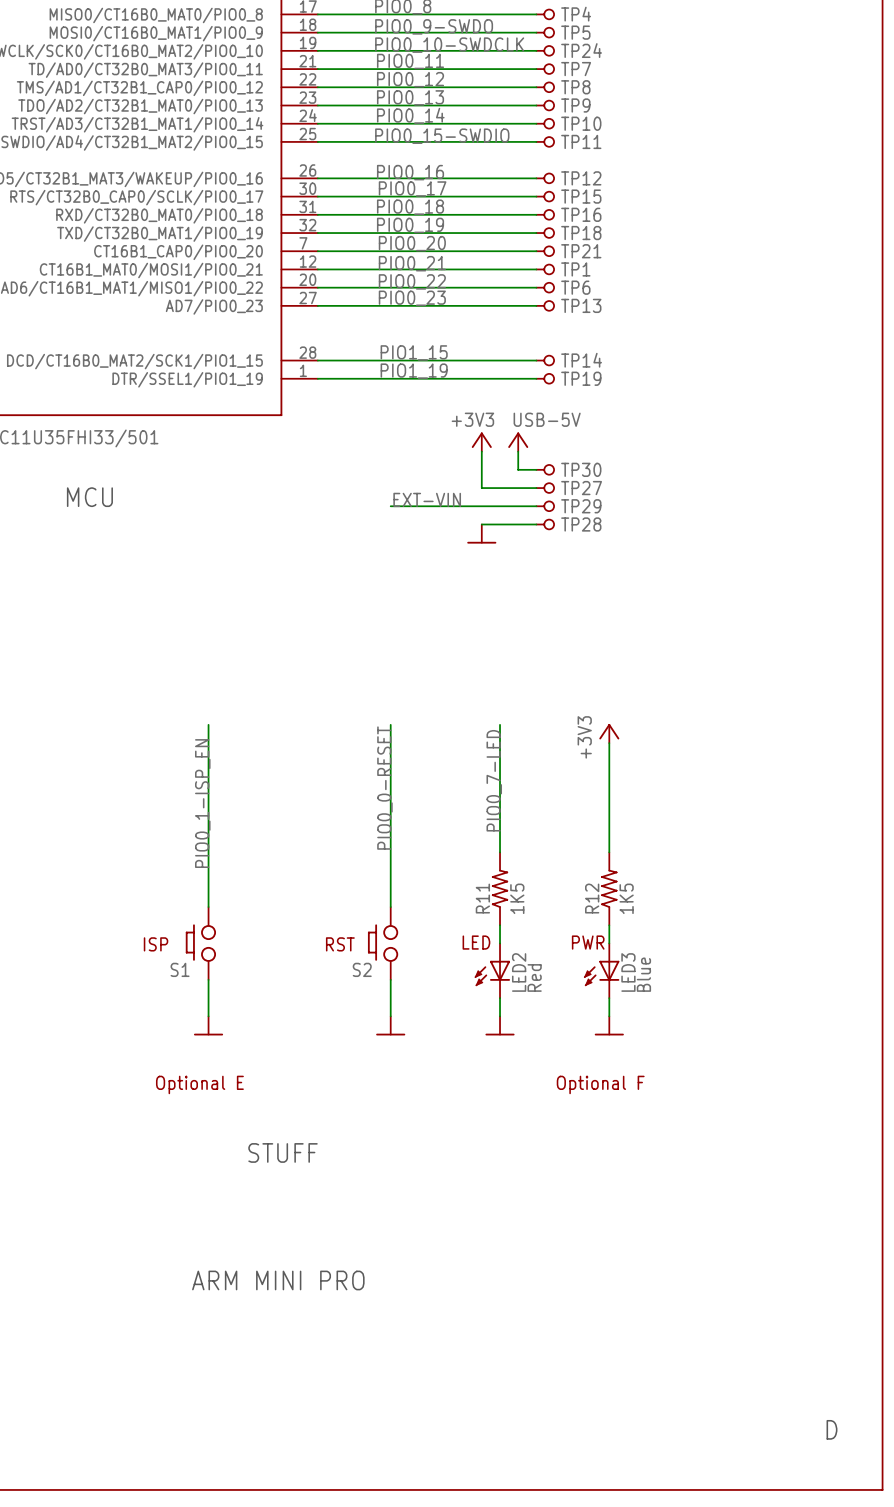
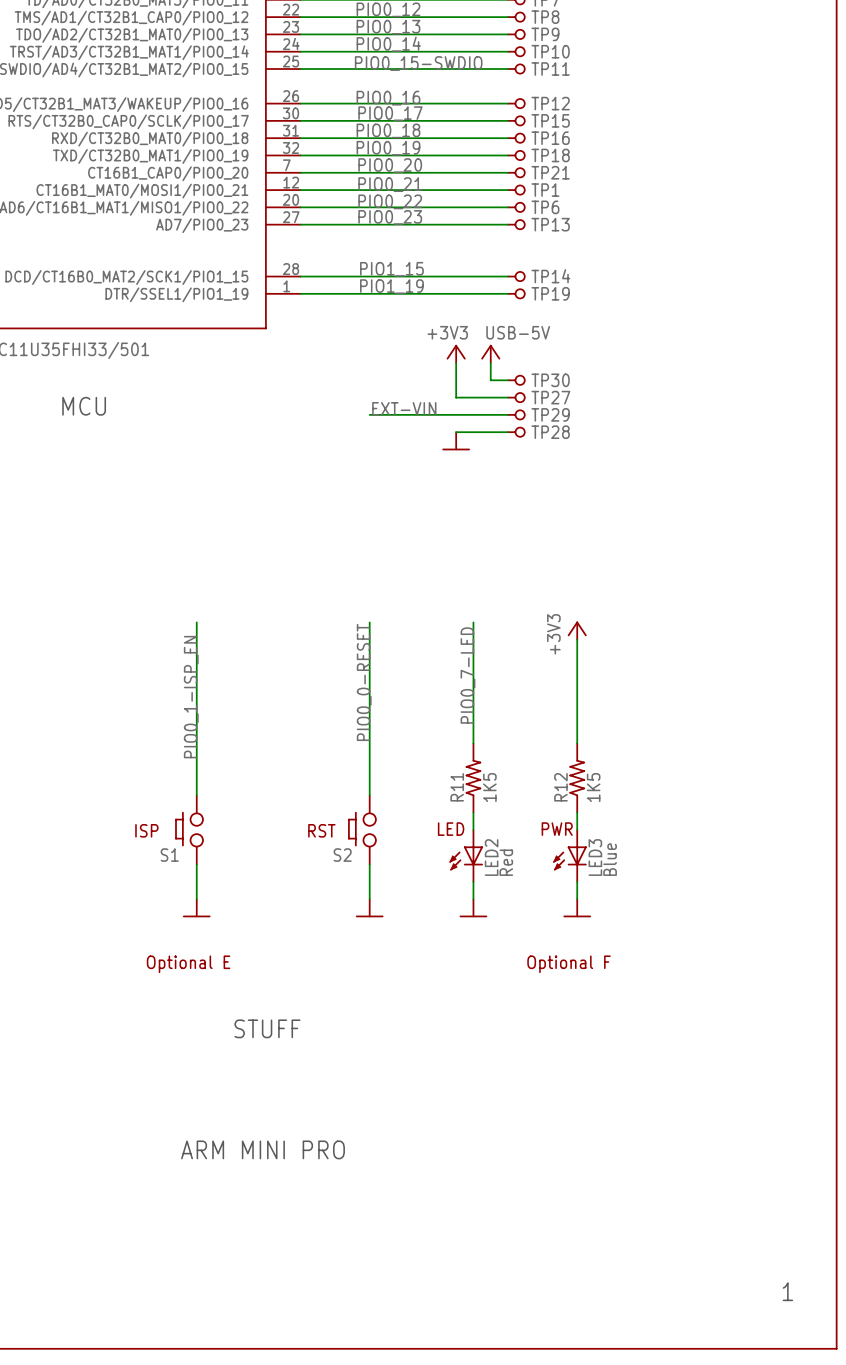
text: D (831, 1429) -> 1 (787, 1291)

